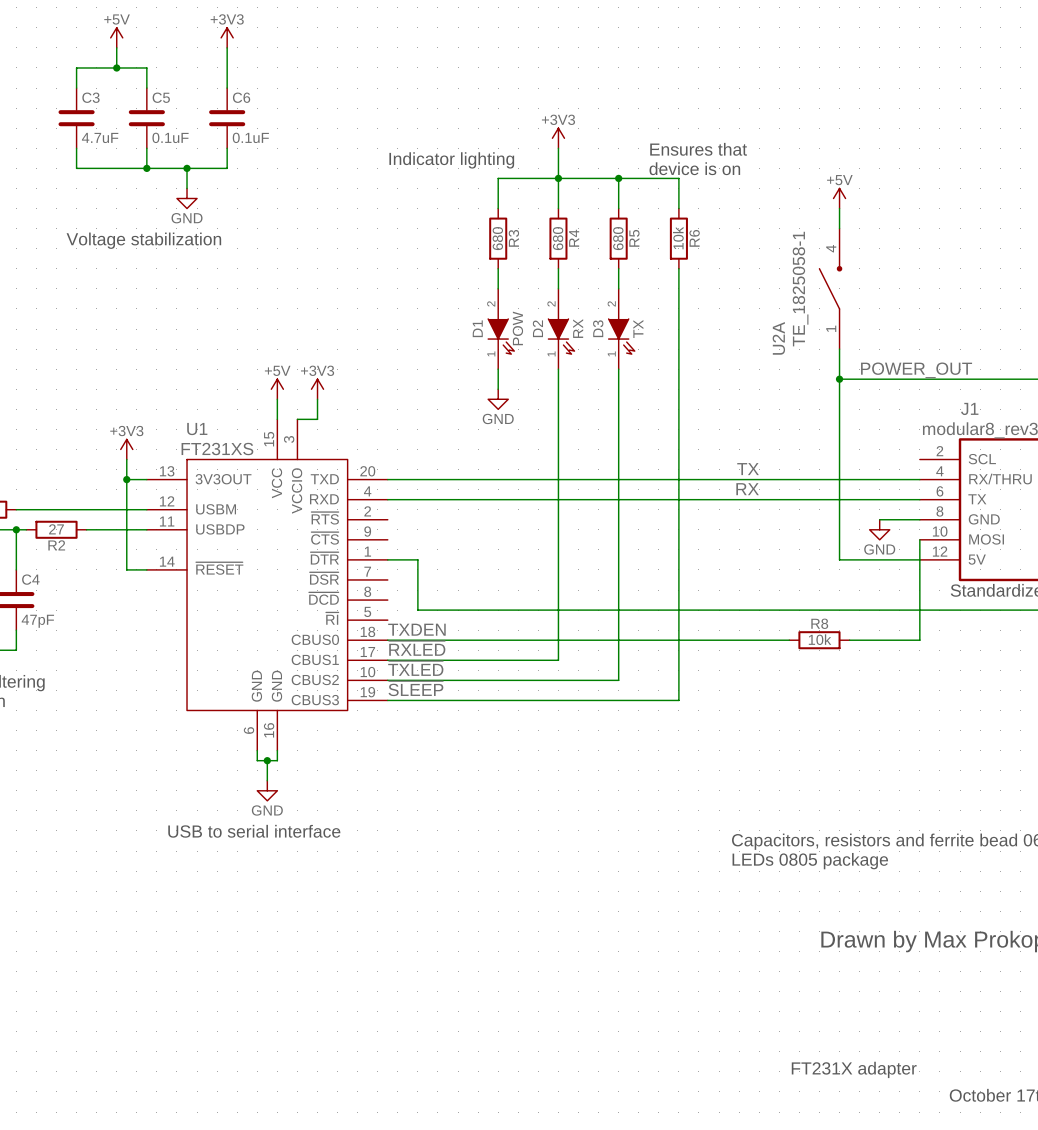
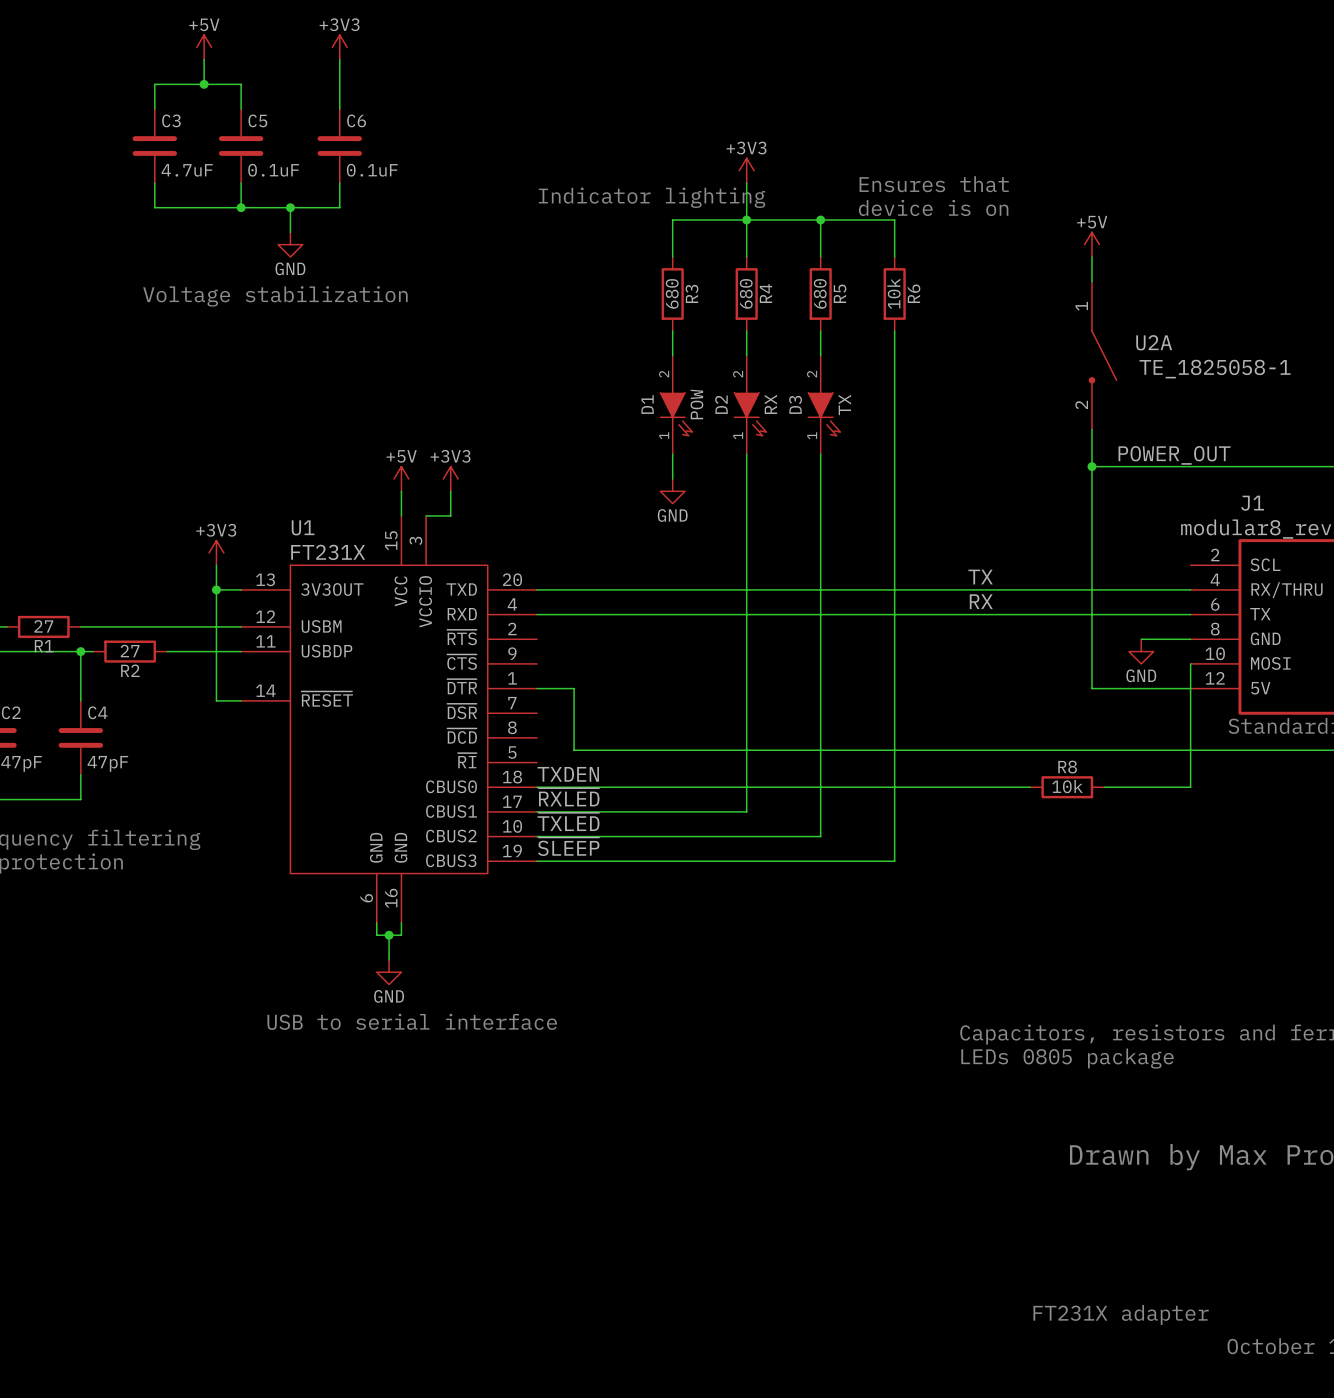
U2A symbol: [819, 228, 842, 350] -> [1089, 281, 1117, 430]
U2A value position: TE_1825058-1 (800, 289) -> TE_1825058-1 (1215, 369)
U2A name position: U2A (778, 338) -> U2A (1154, 342)
U1 value: FT231XS (217, 449) -> FT231X (328, 552)

